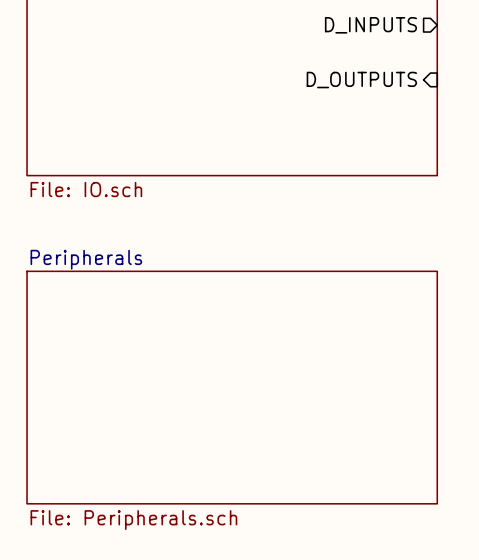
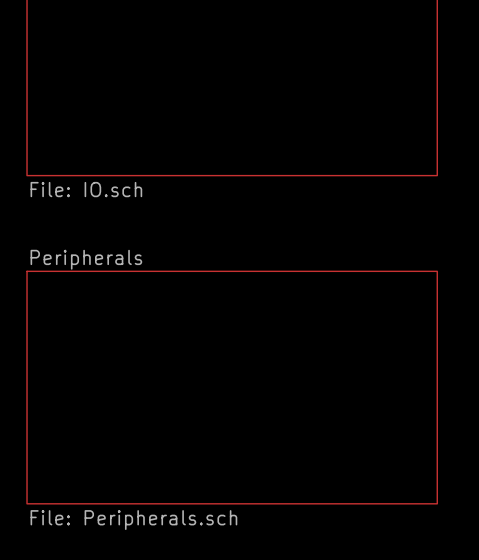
sheet pin: D_INPUTS (370, 25) -> none
sheet pin: D_OUTPUTS (361, 80) -> none

